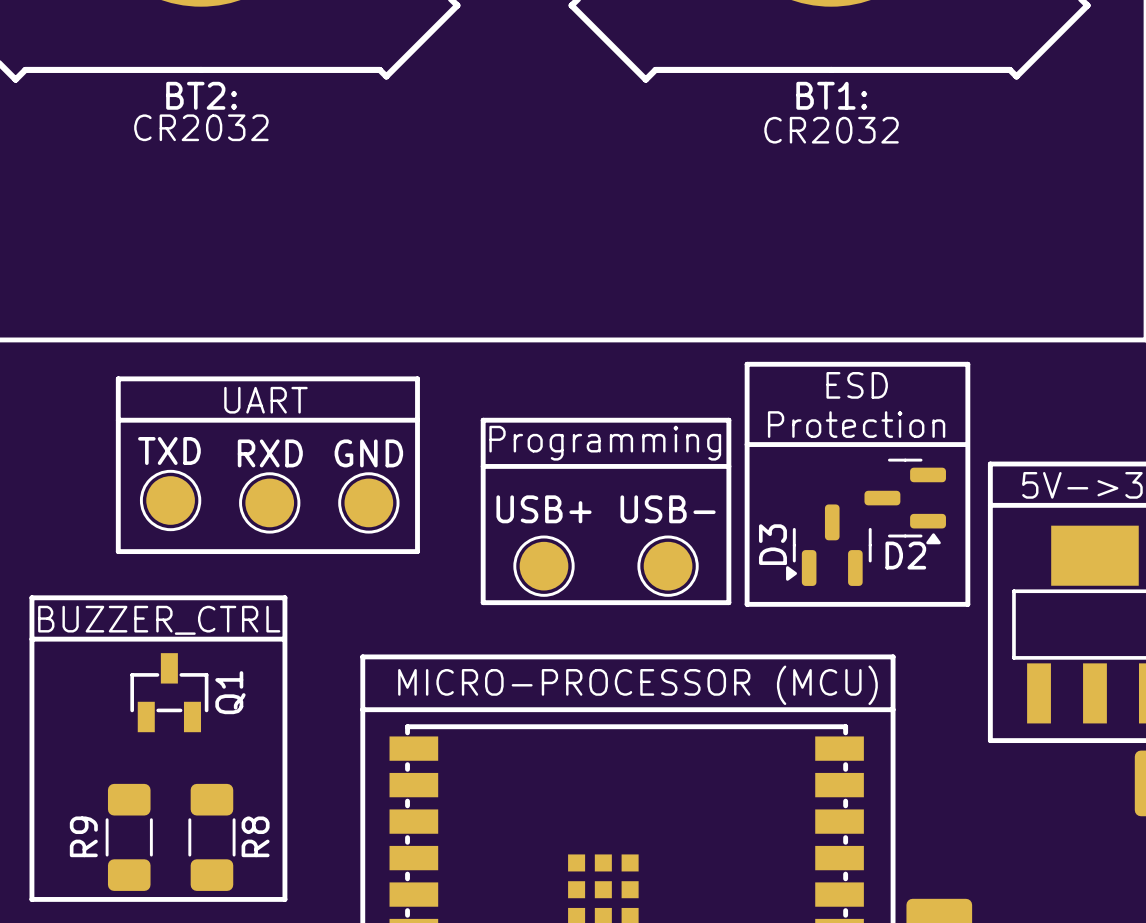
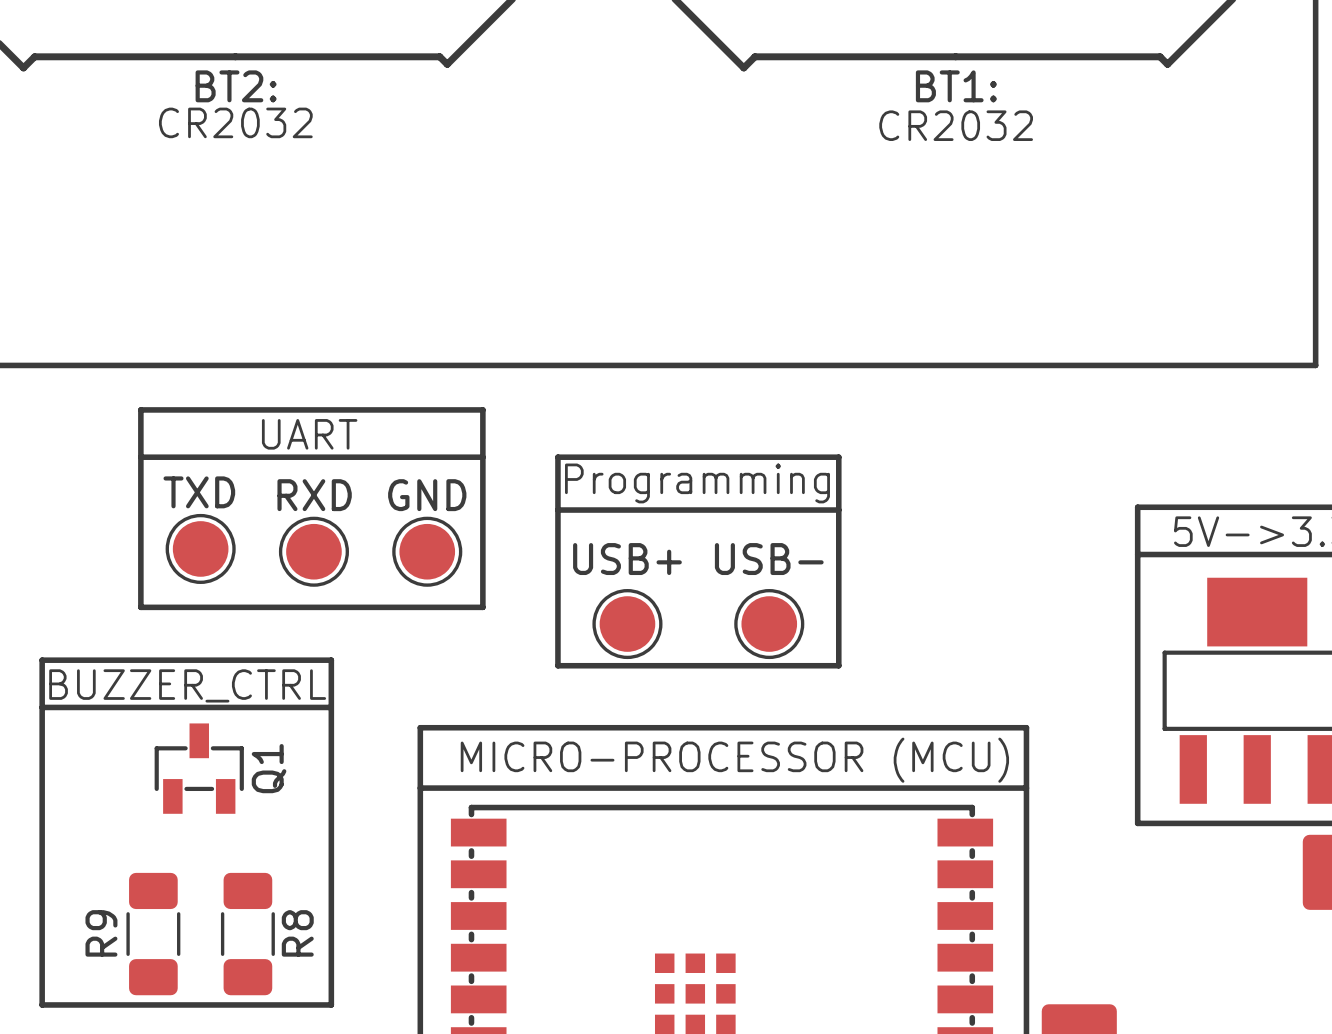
line: (747, 364) (967, 364) (967, 604) (747, 604) (747, 364) -> none
text: ESD (857, 385) -> none
text: Protection (856, 424) -> none
line: (747, 444) (966, 444) -> none
D2: (905, 501) -> none
D3: (828, 545) -> none

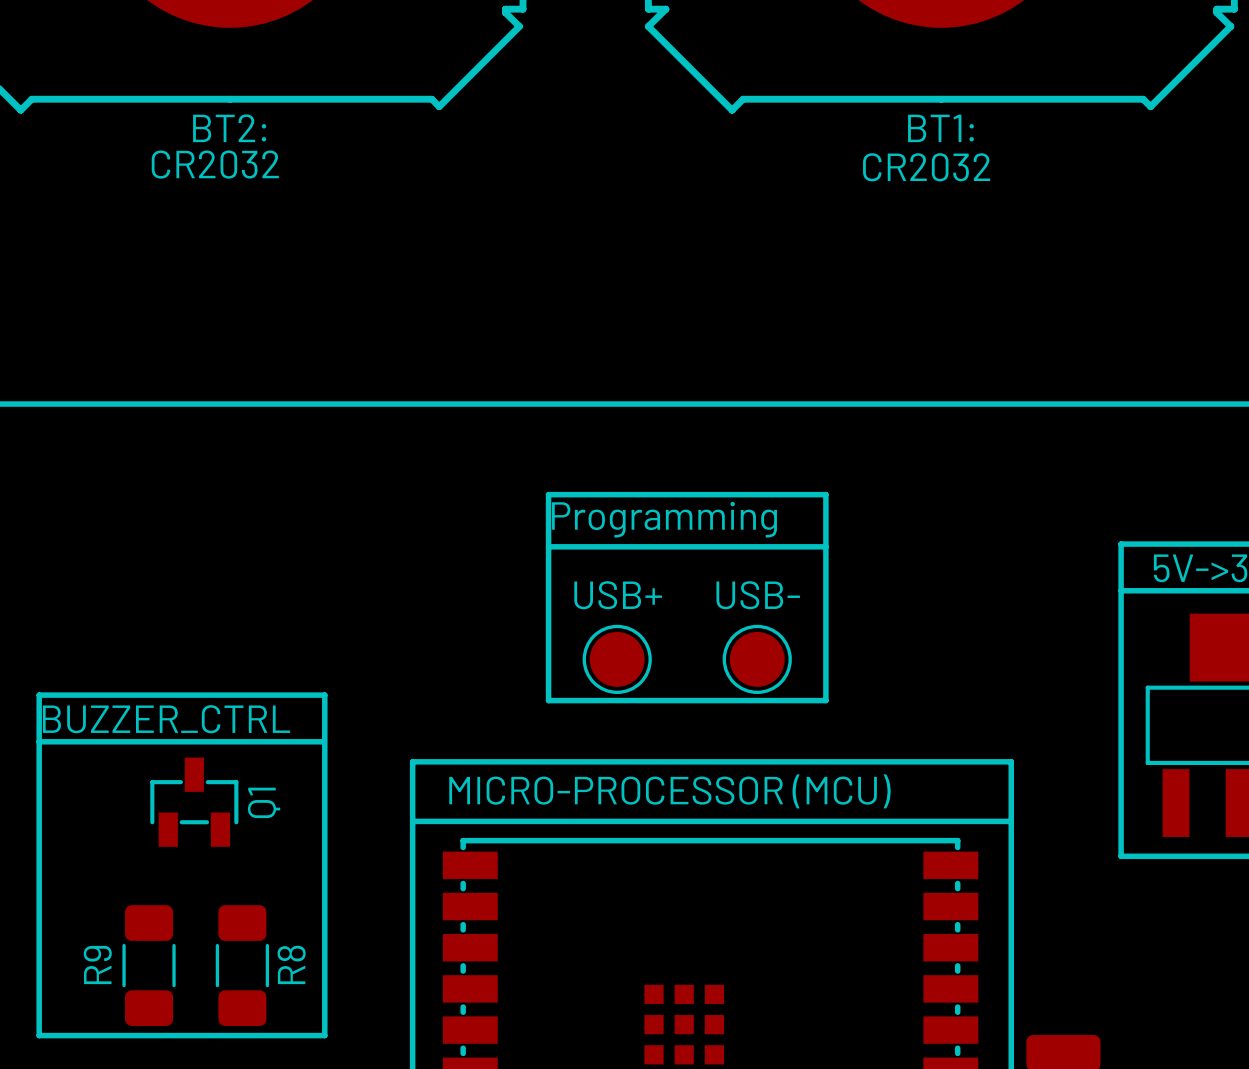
line: (140, 409) (482, 409) (482, 607) (140, 607) (140, 409) -> none
text: UART (309, 434) -> none
line: (140, 457) (482, 457) -> none
TXD: (200, 548) -> none
RXD: (313, 551) -> none
GND: (427, 551) -> none

